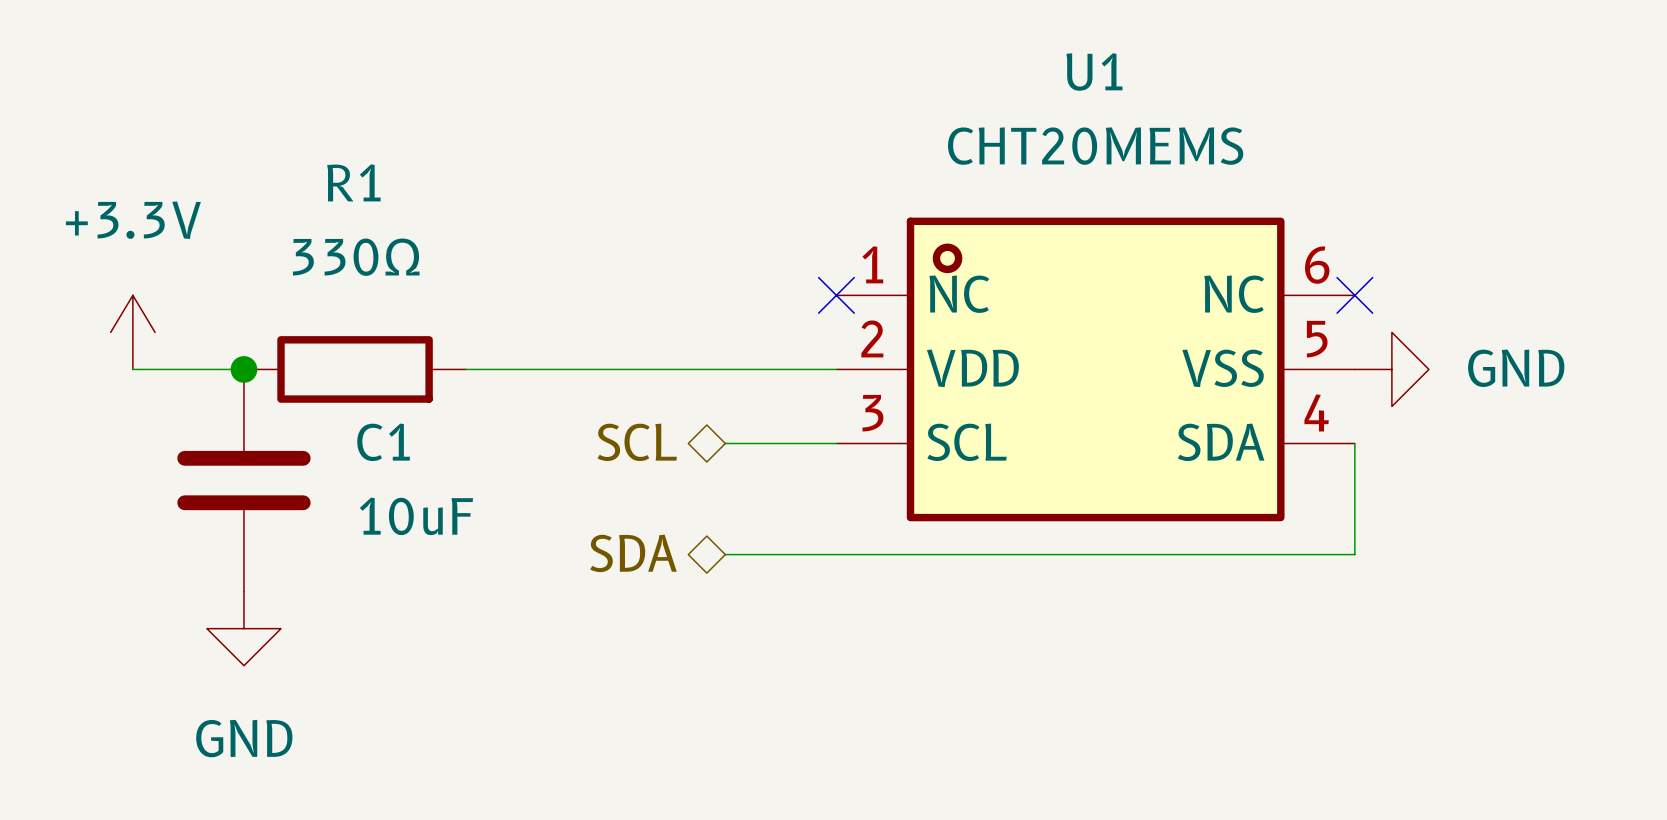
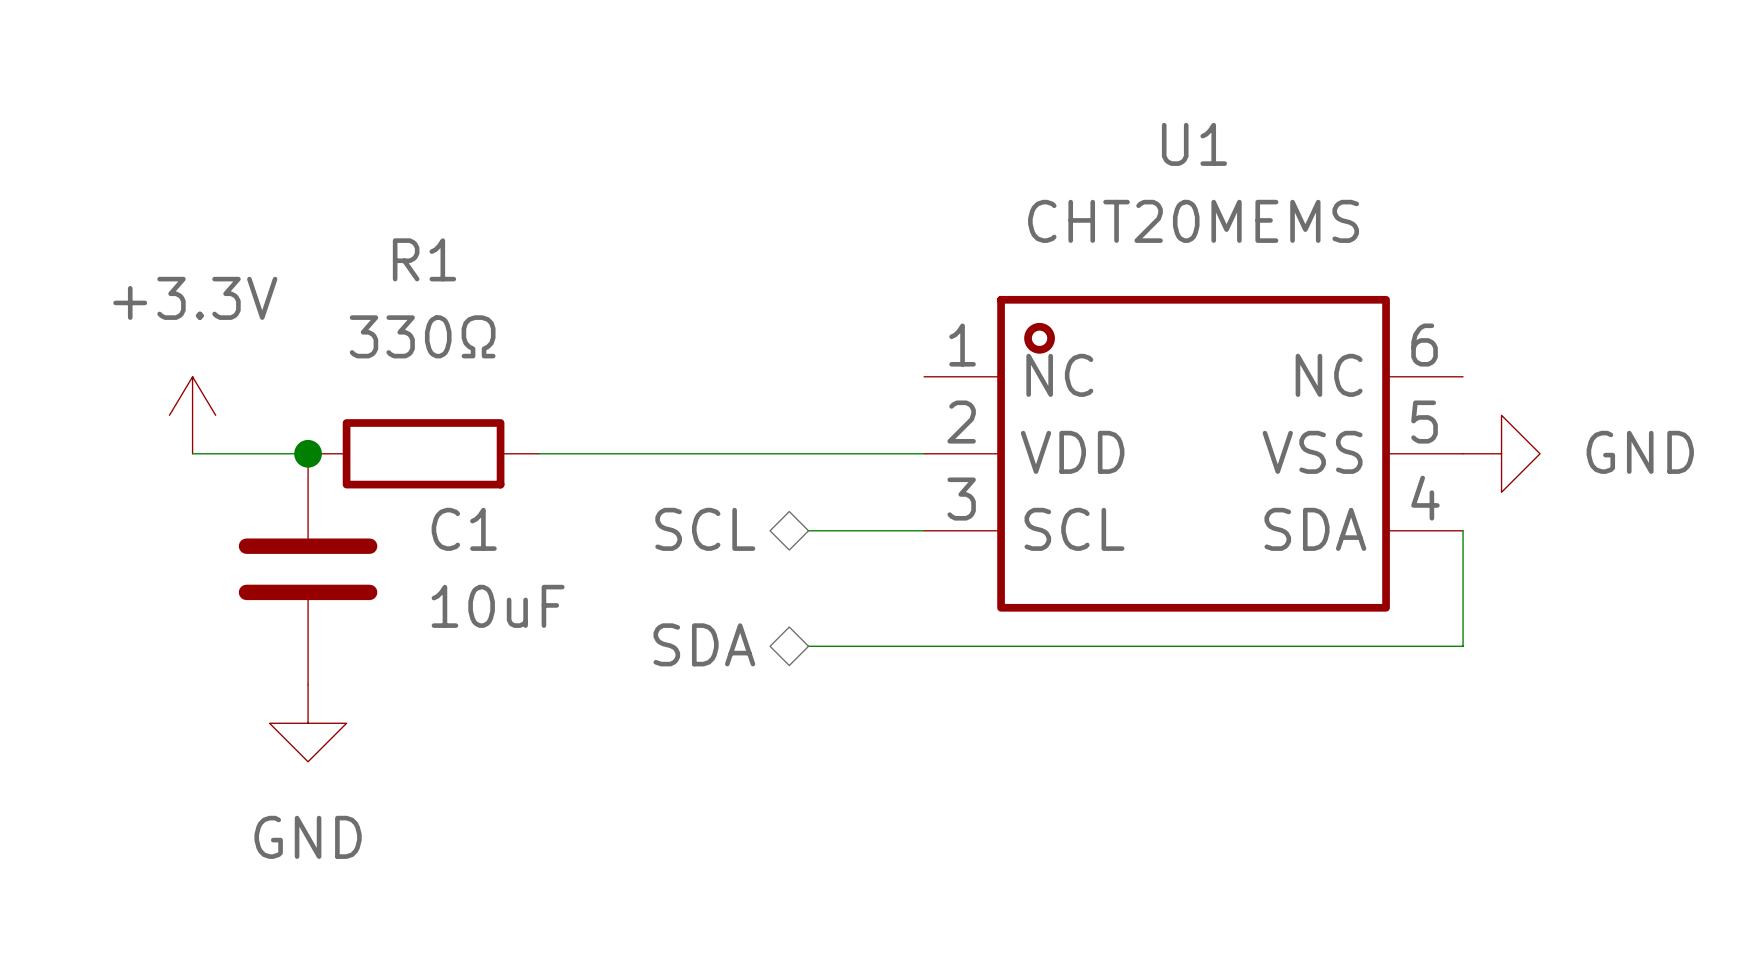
no-connect mark: (836, 295) -> none
no-connect mark: (1354, 295) -> none

